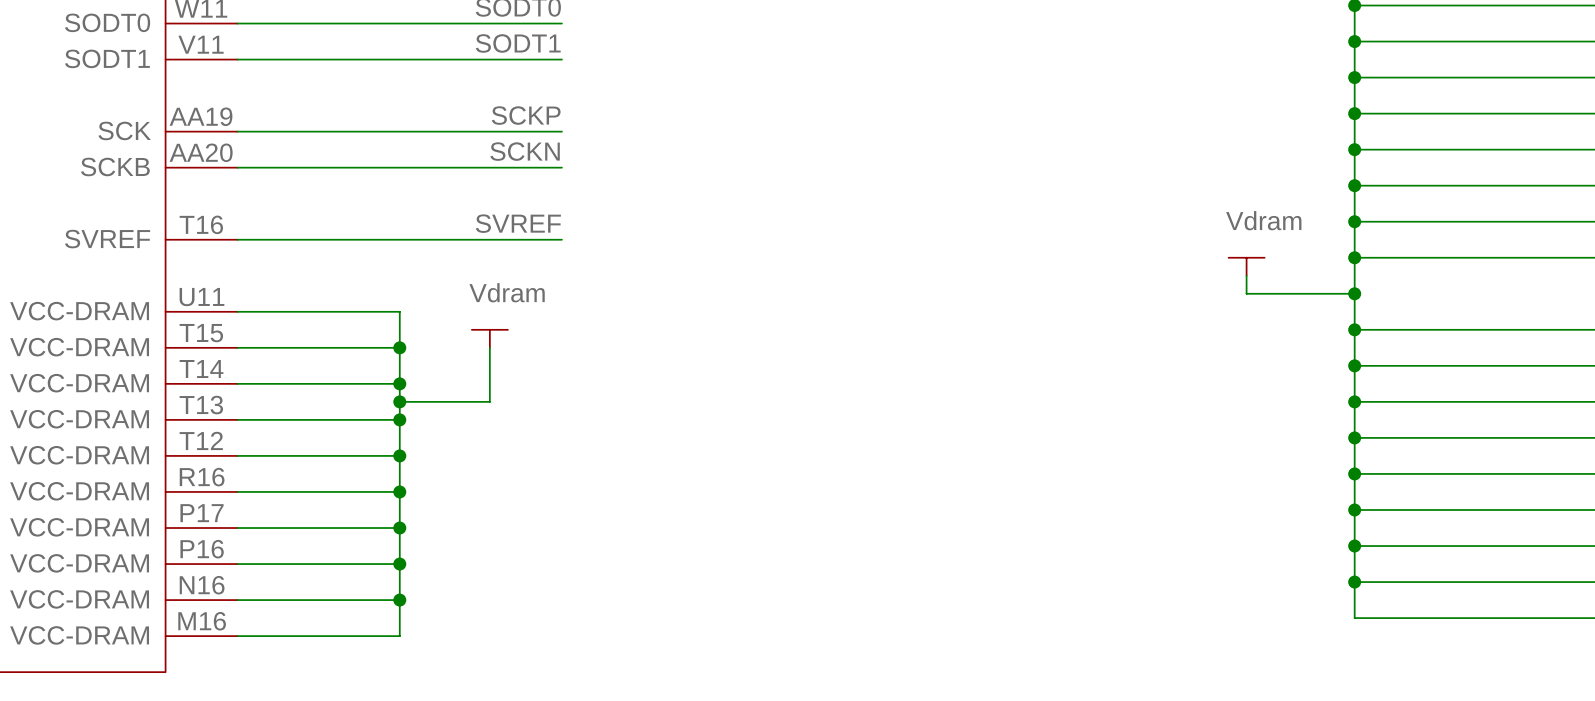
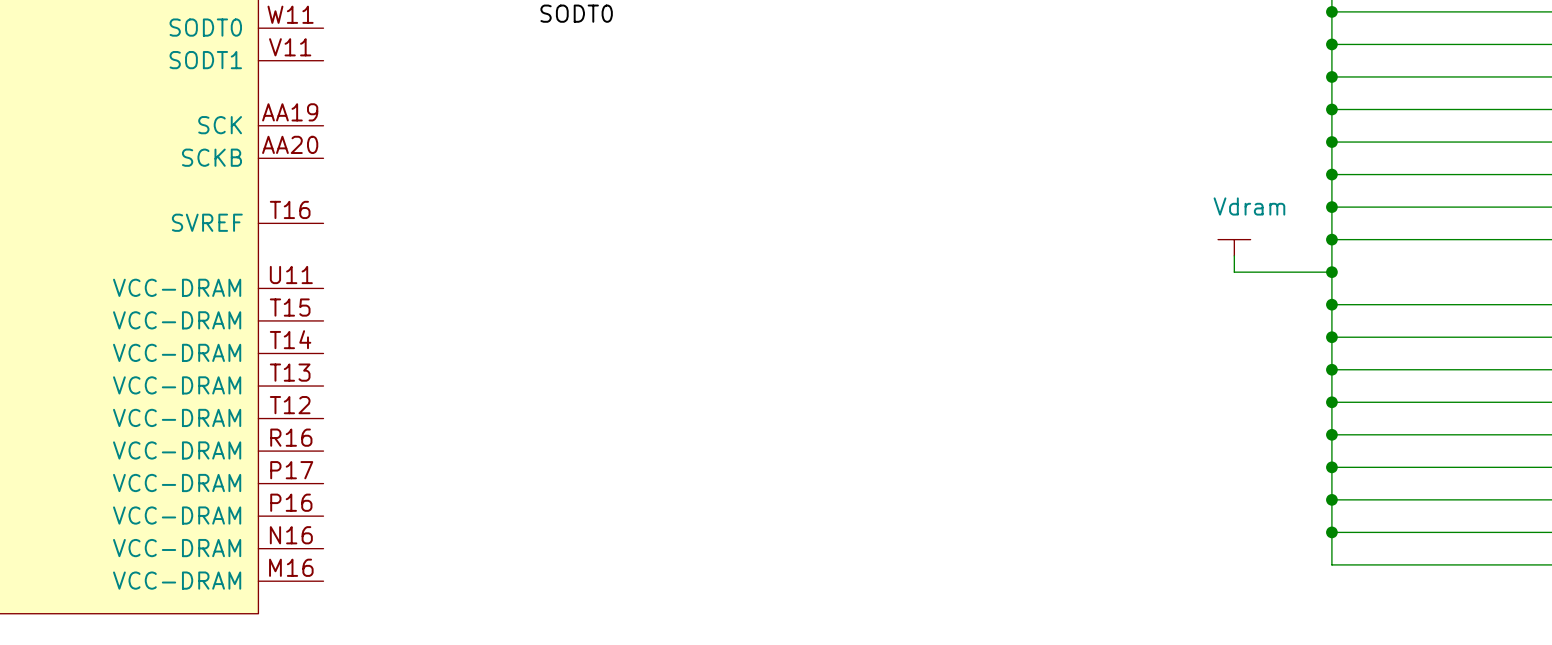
wire: (237, 23) (561, 23) -> none
label: SODT1 (518, 43) -> none
wire: (237, 59) (561, 59) -> none
label: SCKP (526, 115) -> none
wire: (237, 131) (561, 131) -> none
label: SCKN (525, 151) -> none
wire: (237, 167) (561, 167) -> none
label: SVREF (518, 223) -> none
wire: (237, 239) (561, 239) -> none
wire: (237, 311) (399, 311) (399, 636) (237, 636) -> none
power symbol: Vdram (489, 338) -> none
wire: (237, 347) (399, 347) -> none
junction: (399, 347) -> none
wire: (489, 347) (489, 401) (399, 401) -> none
wire: (237, 383) (399, 383) -> none
junction: (399, 383) -> none
junction: (399, 401) -> none
wire: (237, 419) (399, 419) -> none
junction: (399, 419) -> none
wire: (237, 455) (399, 455) -> none
junction: (399, 455) -> none
wire: (237, 491) (399, 491) -> none
junction: (399, 491) -> none
wire: (237, 528) (399, 528) -> none
junction: (399, 528) -> none
wire: (237, 564) (399, 564) -> none
junction: (399, 564) -> none
wire: (237, 600) (399, 600) -> none
junction: (399, 600) -> none

